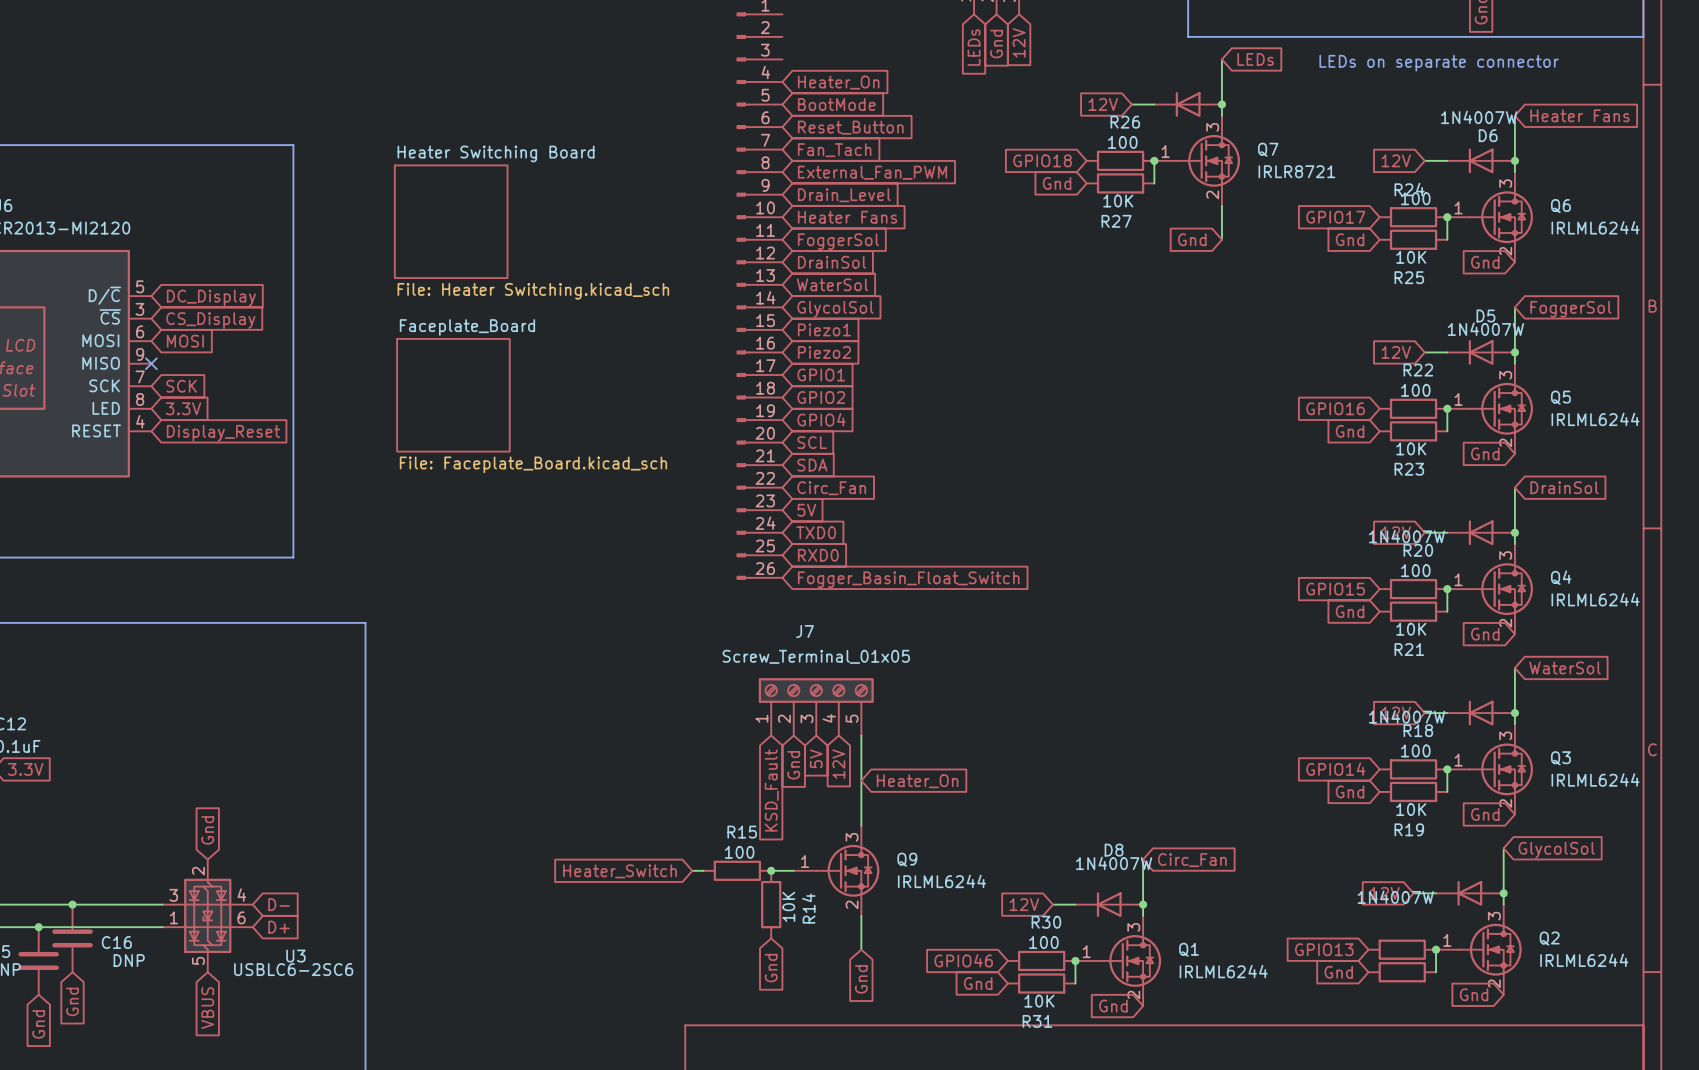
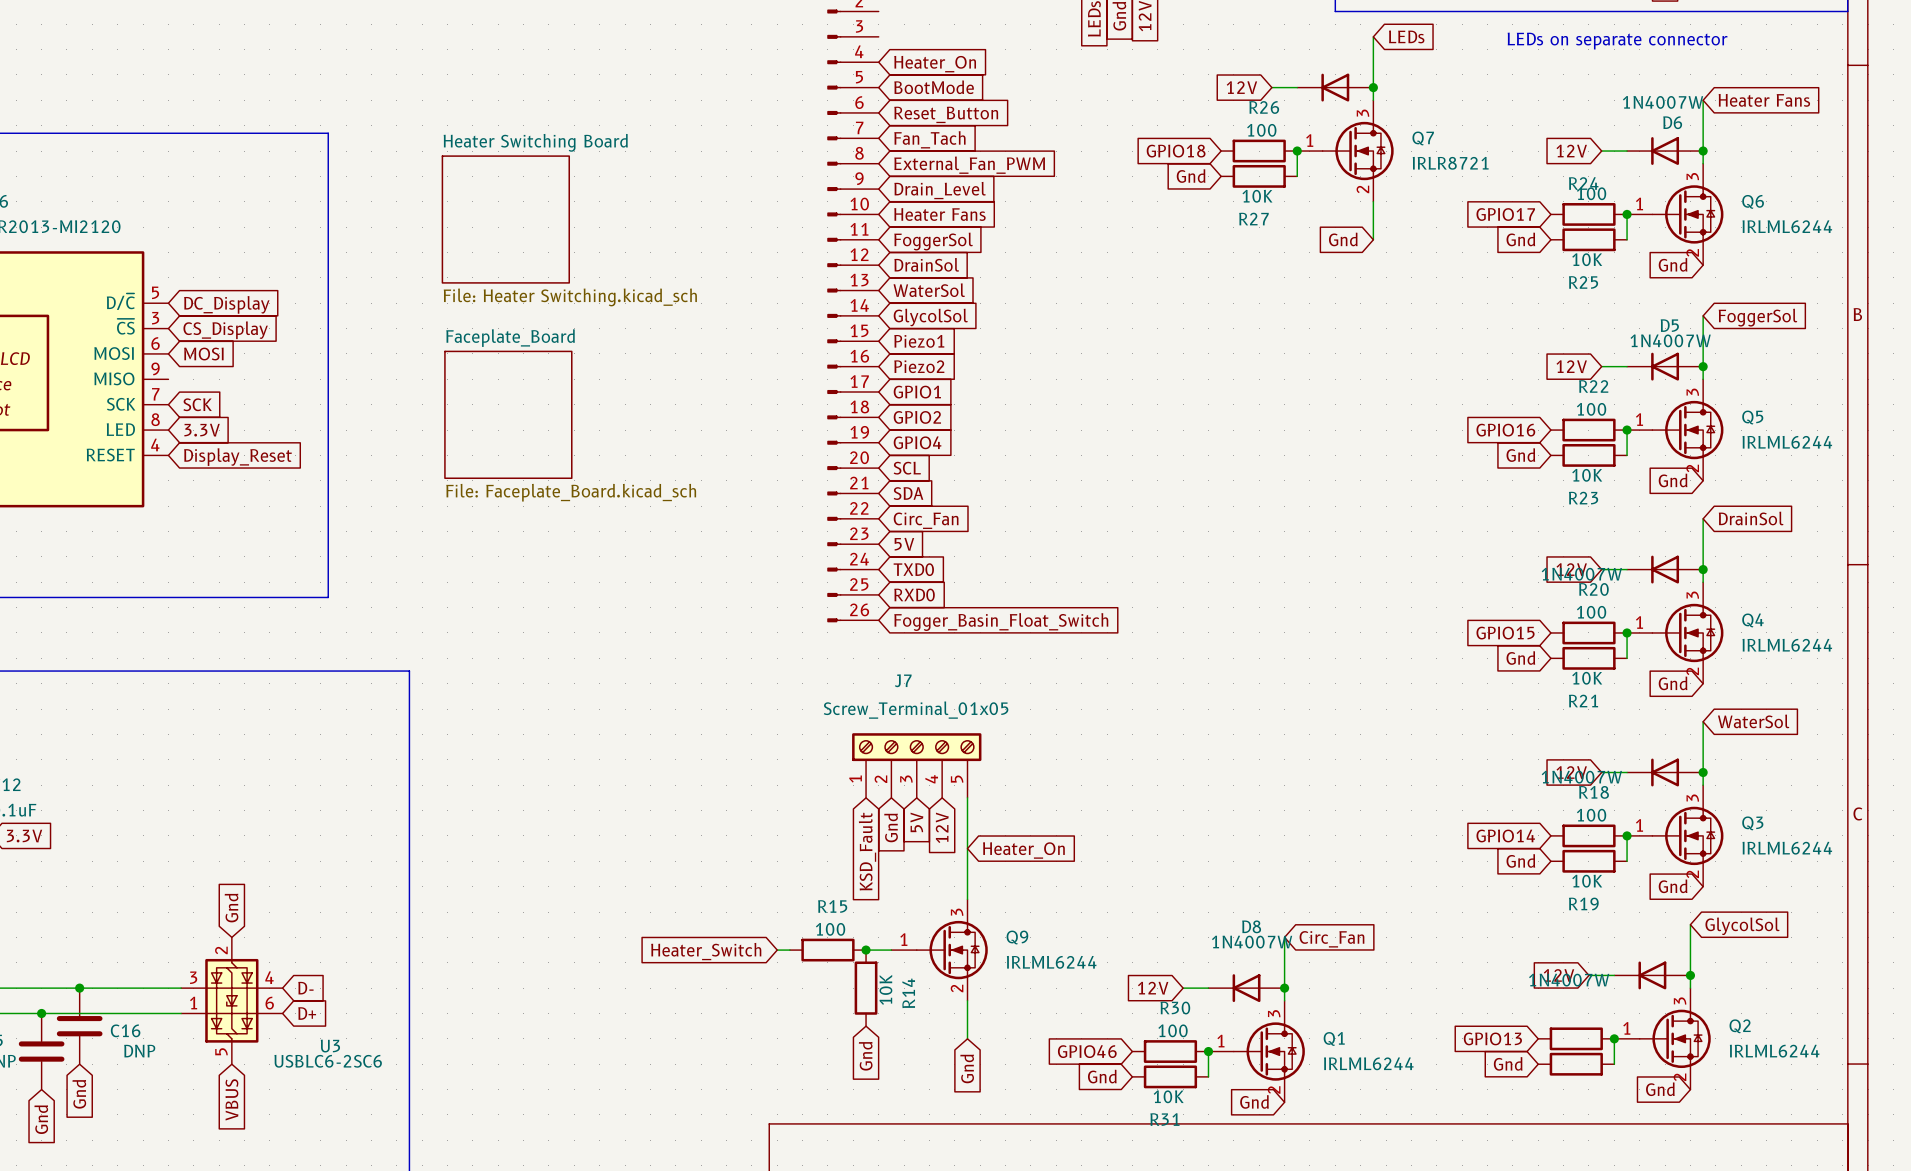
no-connect mark: (151, 363) -> none

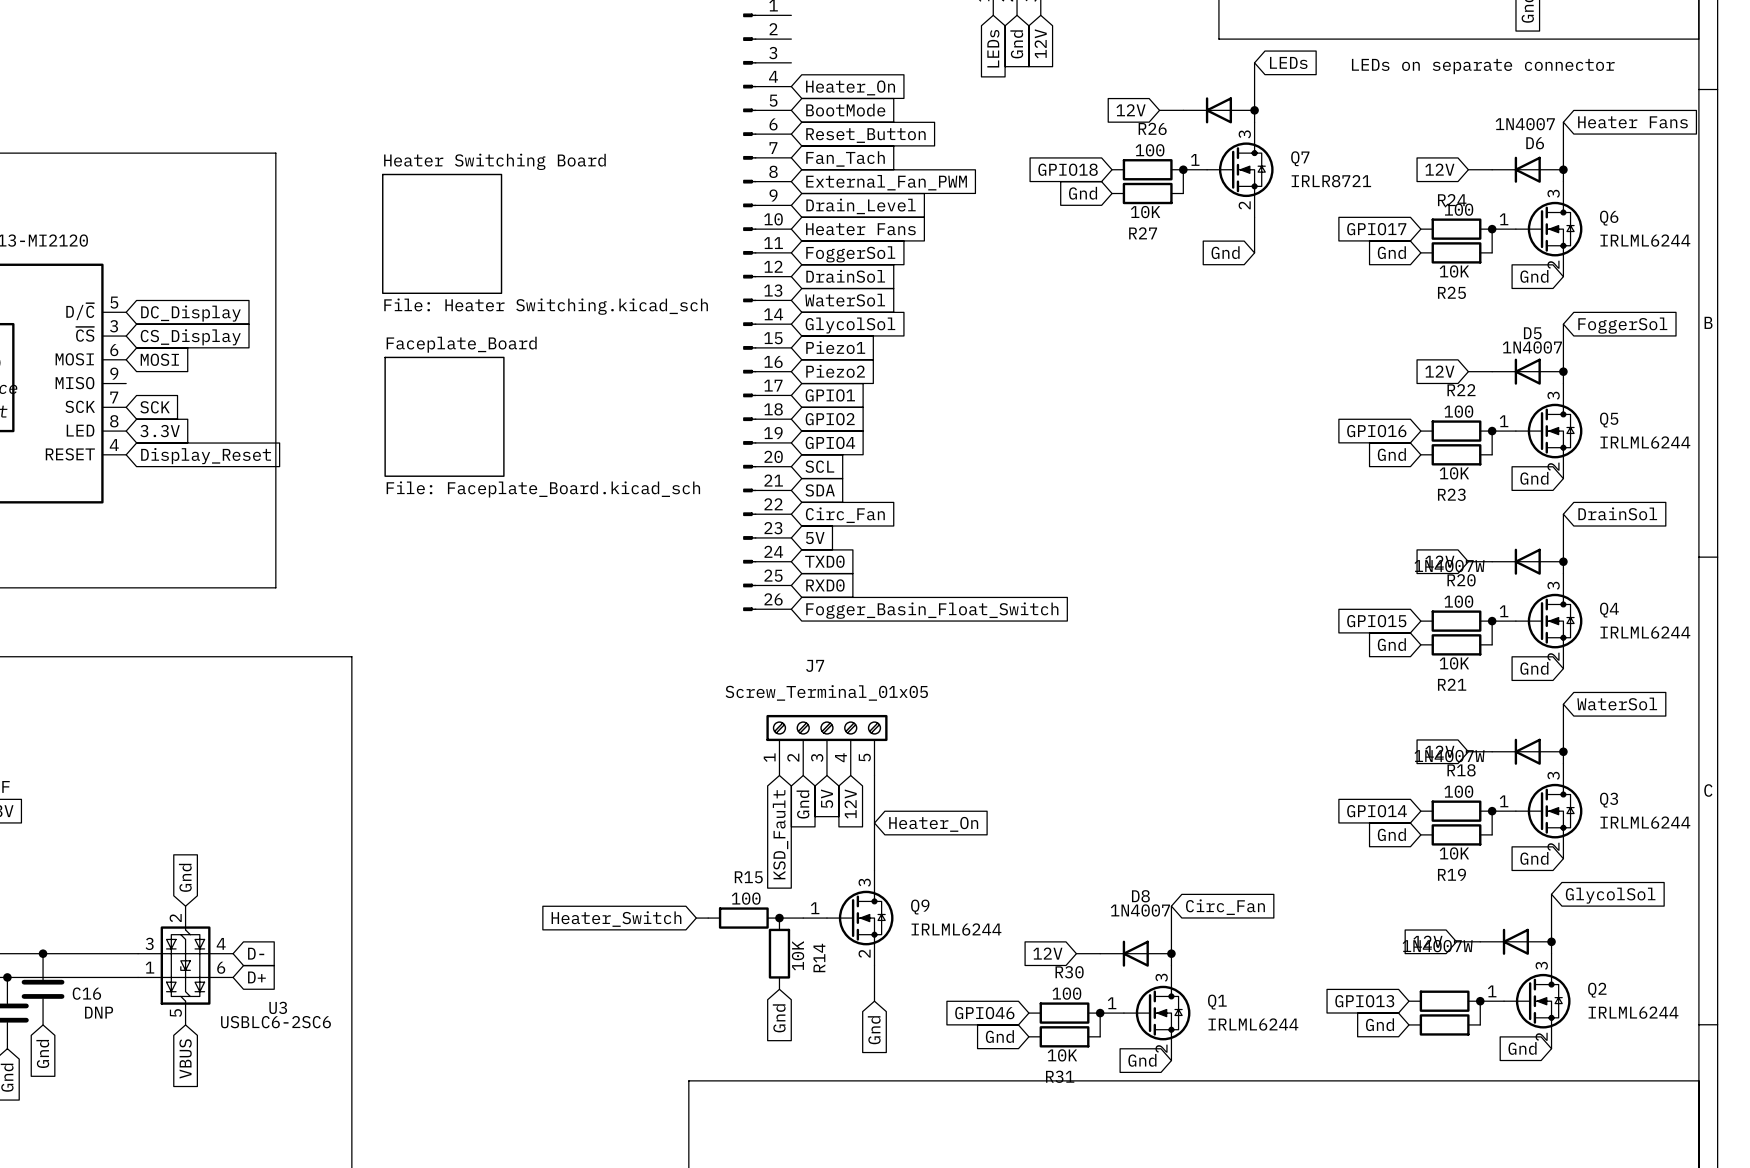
D6 value: 1N4007W (1663, 102) -> 1N4007 (1525, 124)
D5 value: 1N4007W (1670, 340) -> 1N4007 (1532, 347)
D8 value: 1N4007W (1252, 942) -> 1N4007 (1140, 910)

